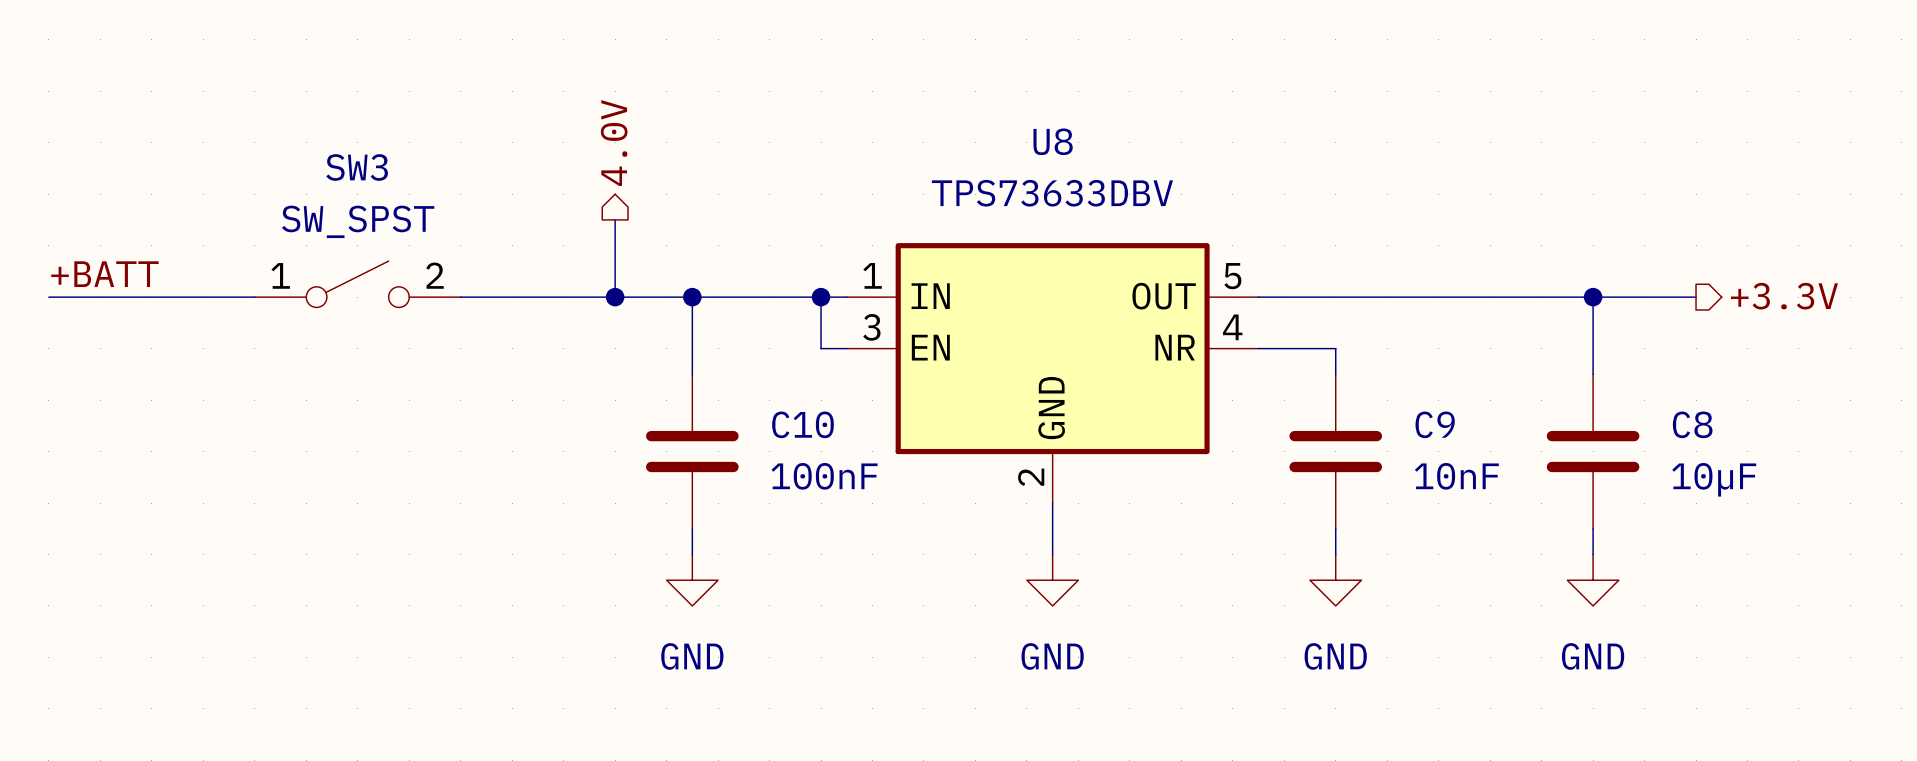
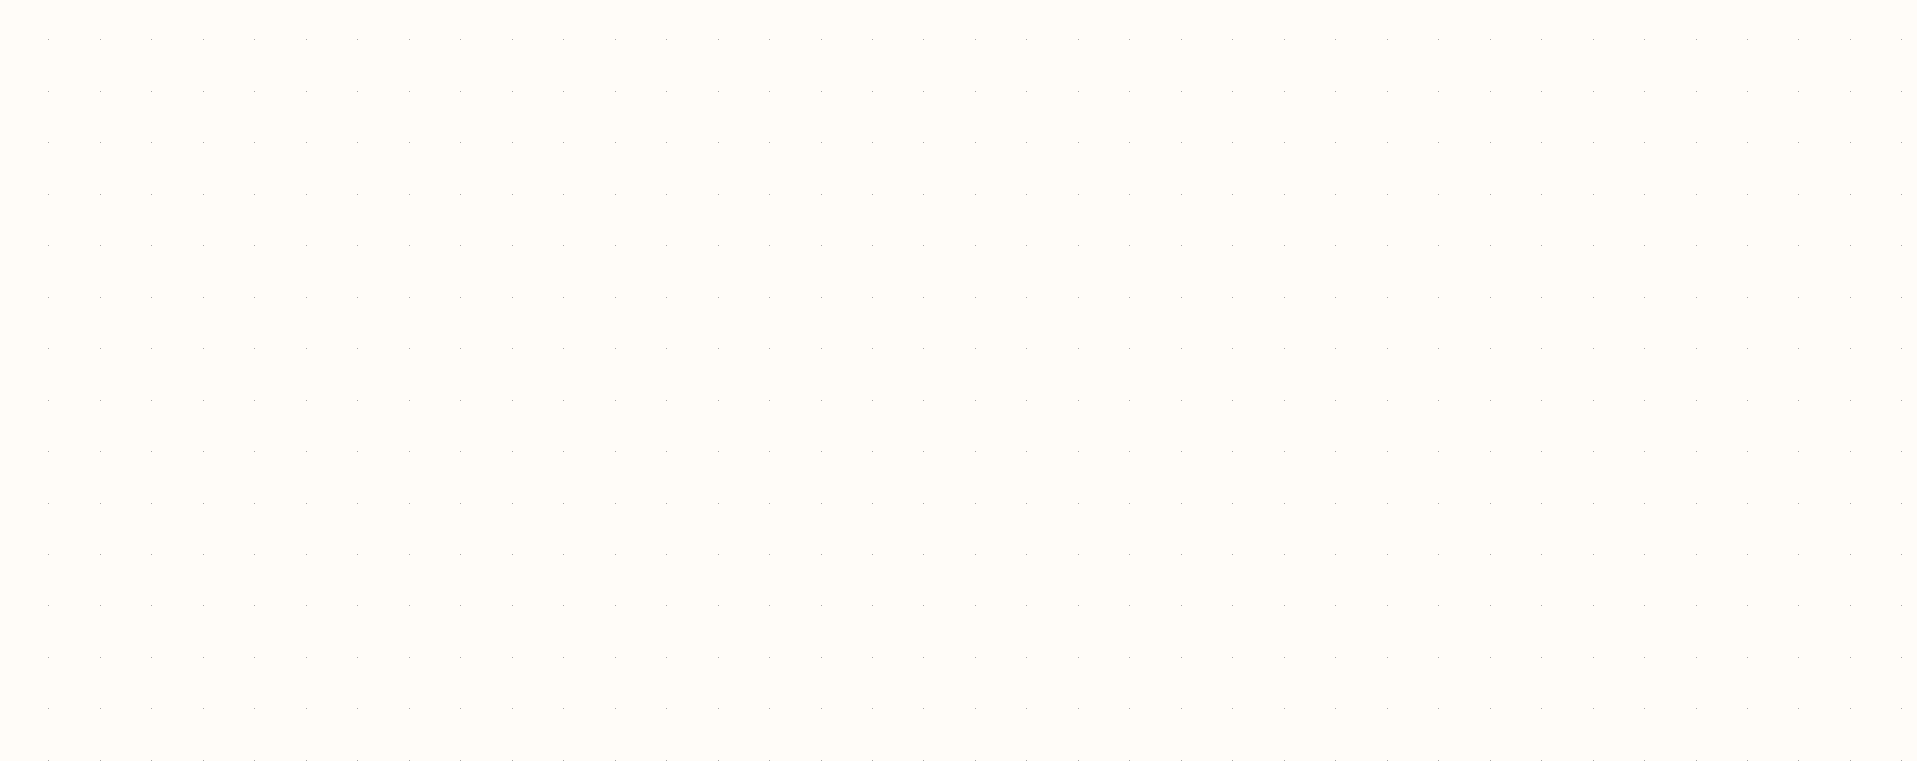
hierarchical label: 4.0V (614, 143) -> none
wire: (615, 219) (615, 297) -> none
label: +BATT (104, 274) -> none
SW3: SW_SPST (357, 284) -> none
hierarchical label: +3.3V (1784, 296) -> none
wire: (48, 297) (254, 297) -> none
wire: (460, 297) (846, 297) -> none
junction: (615, 297) -> none
wire: (692, 297) (692, 374) -> none
junction: (692, 297) -> none
wire: (821, 297) (821, 348) (846, 348) -> none
junction: (821, 297) -> none
wire: (1258, 297) (1696, 297) -> none
wire: (1593, 297) (1593, 374) -> none
junction: (1593, 297) -> none
wire: (1258, 348) (1335, 348) (1335, 374) -> none
U8: TPS73633DBV (1052, 373) -> none
C10: 100nF (692, 451) -> none
C9: 10nF (1335, 451) -> none
C8: 10µF (1593, 451) -> none
wire: (1052, 503) (1052, 554) -> none
wire: (692, 528) (692, 554) -> none
wire: (1335, 528) (1335, 554) -> none
wire: (1593, 528) (1593, 554) -> none
power symbol: GND (692, 580) -> none
power symbol: GND (1052, 580) -> none
power symbol: GND (1335, 580) -> none
power symbol: GND (1593, 580) -> none

